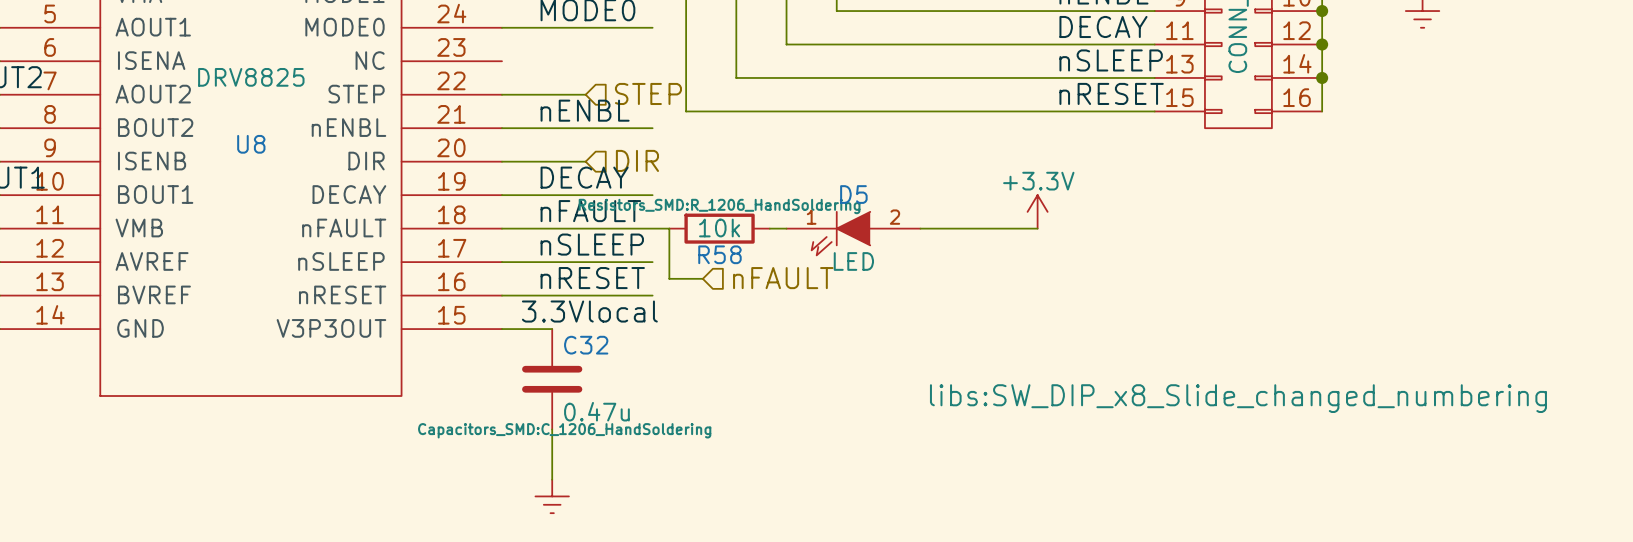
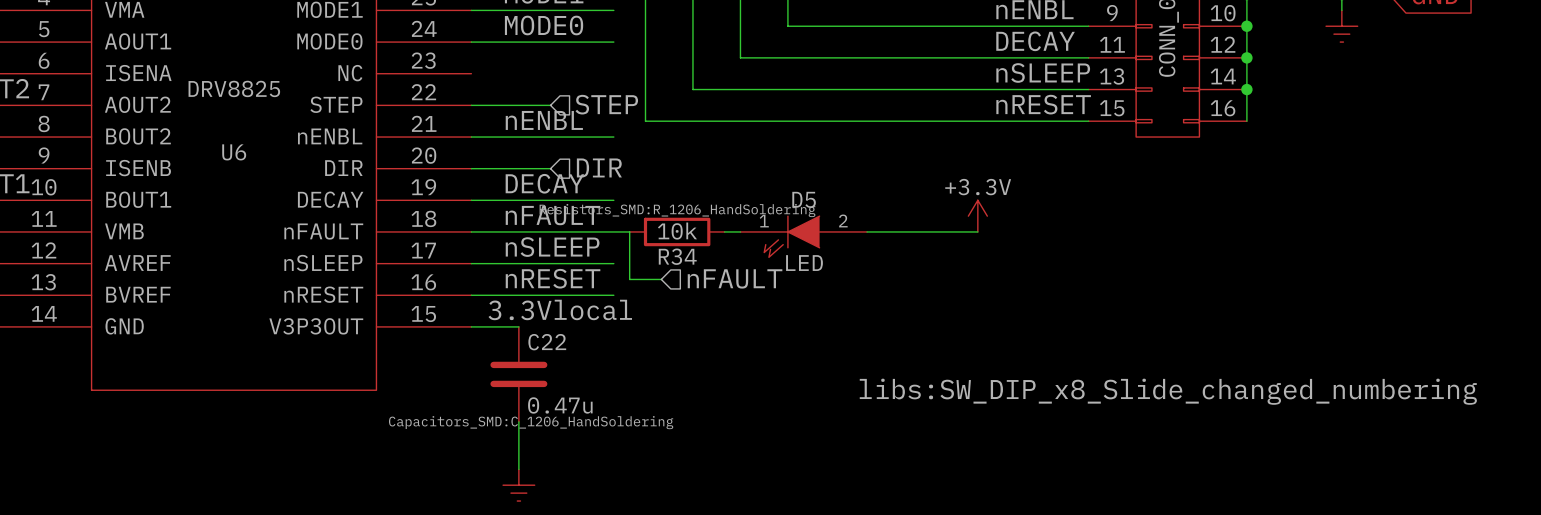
U8 name: U8 (251, 144) -> U6 (234, 152)
R58 name: R58 (719, 254) -> R34 (677, 256)
C32 name: C32 (586, 345) -> C22 (547, 342)

